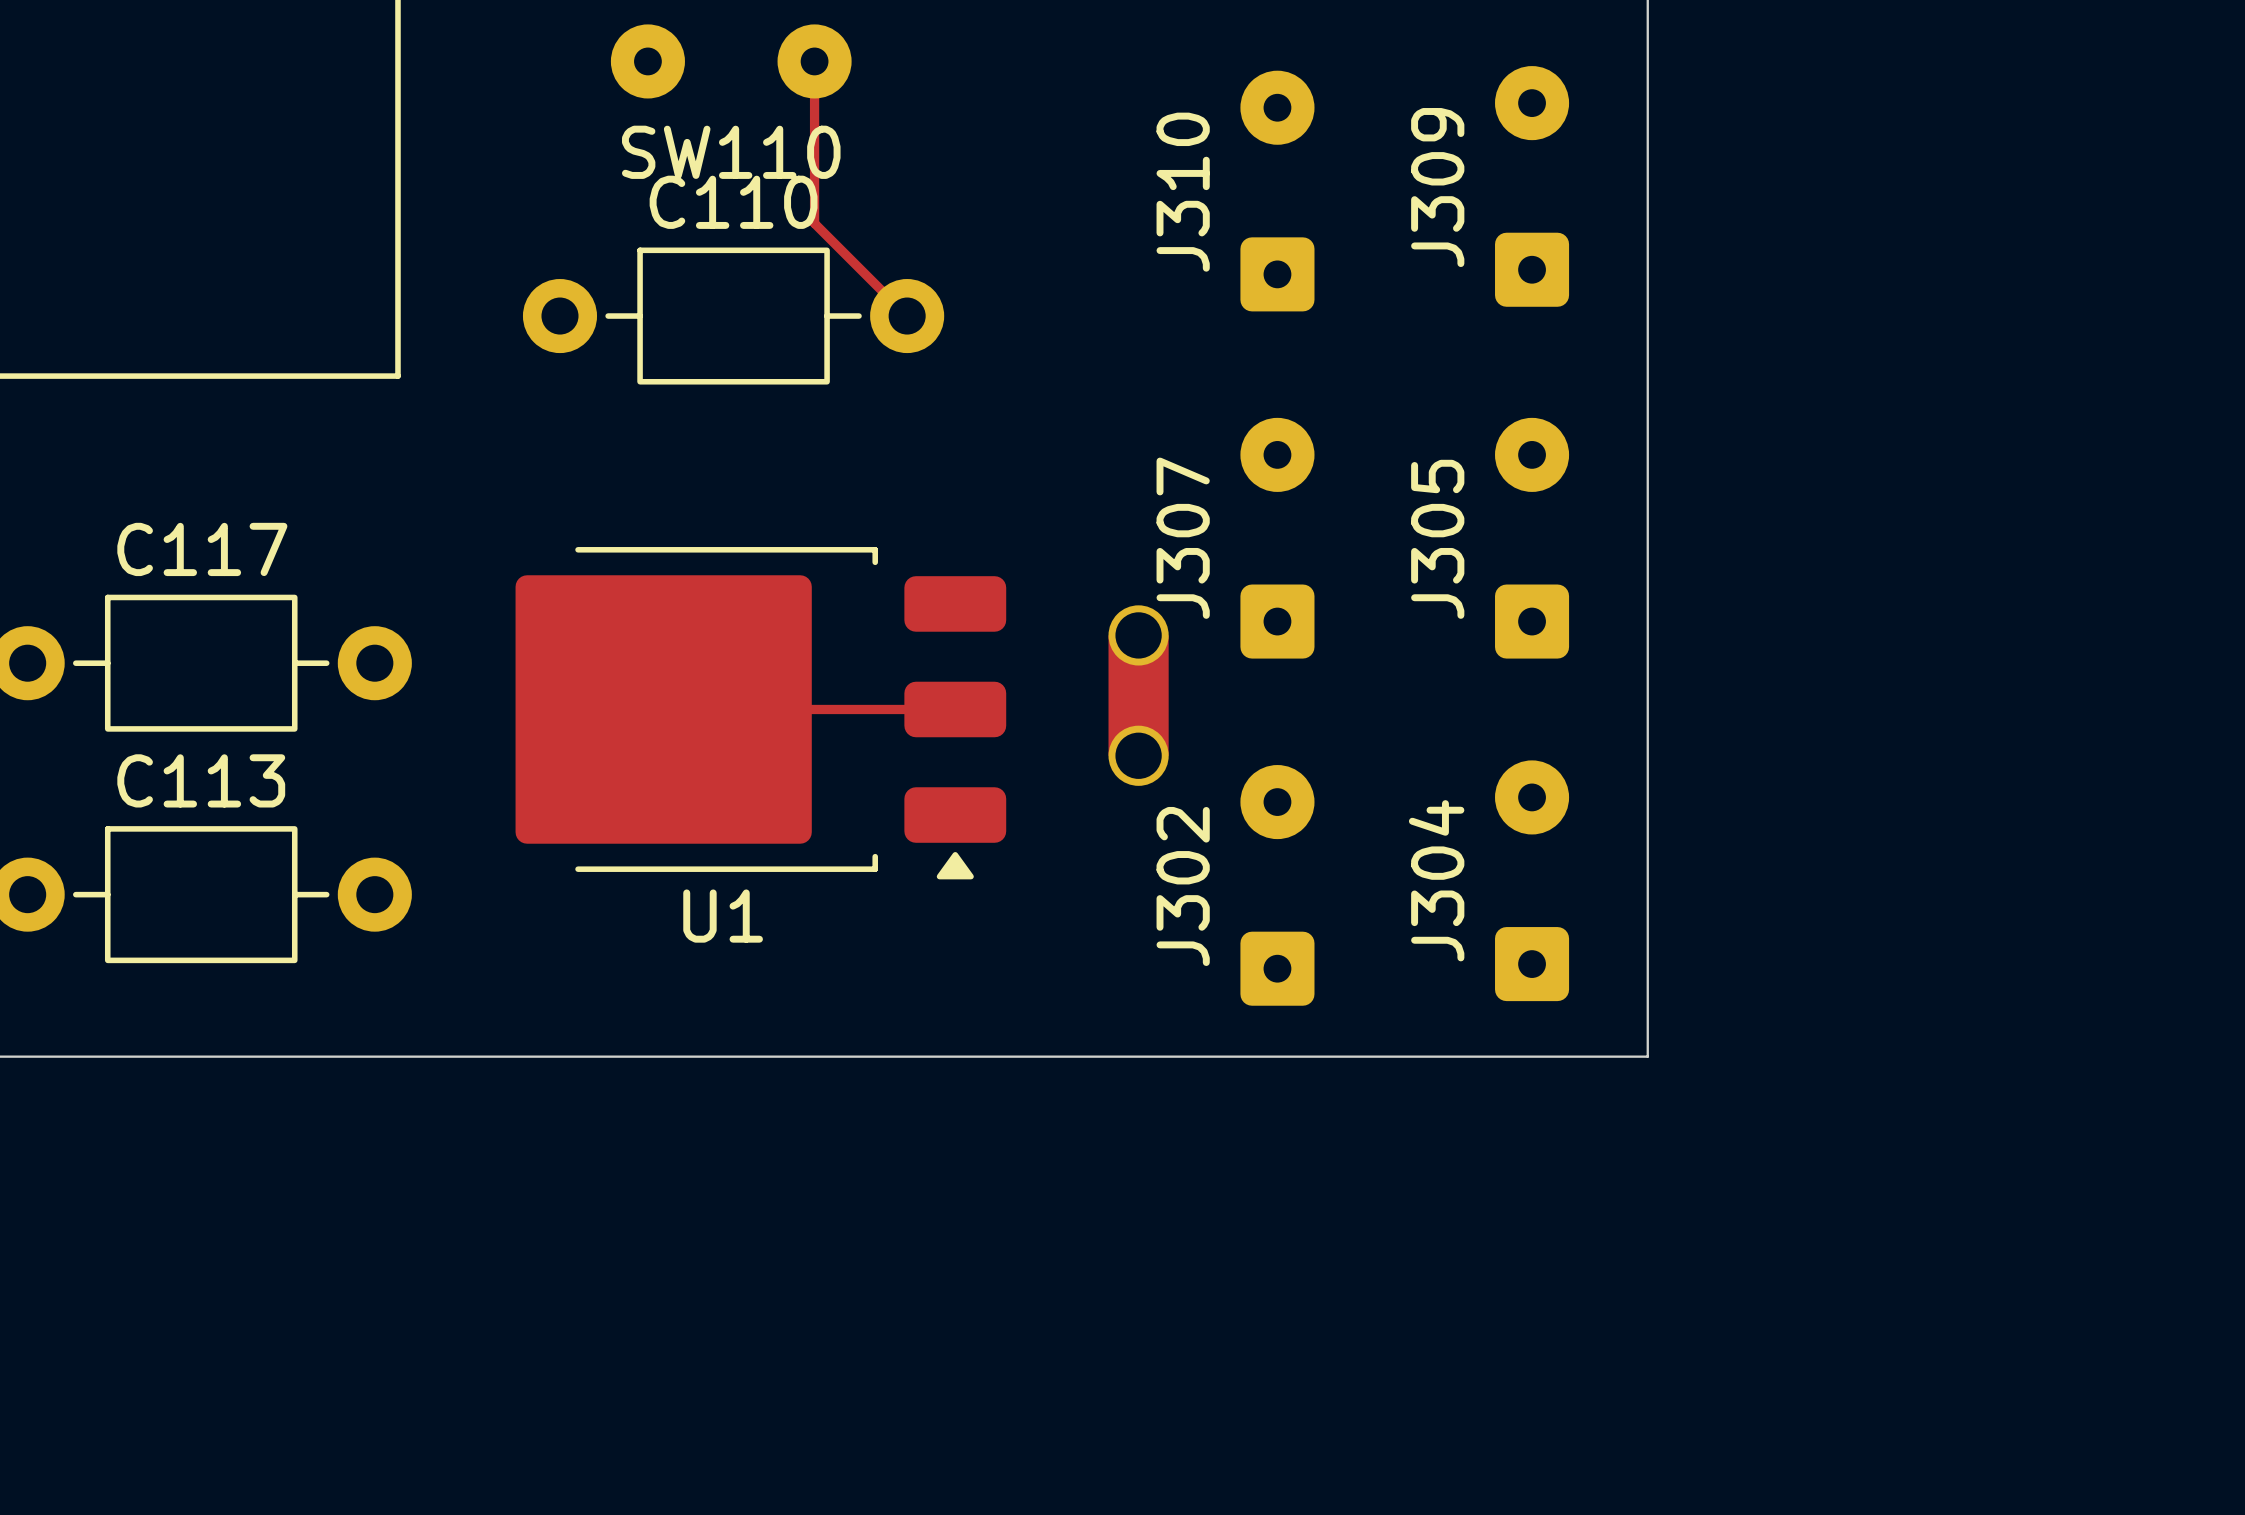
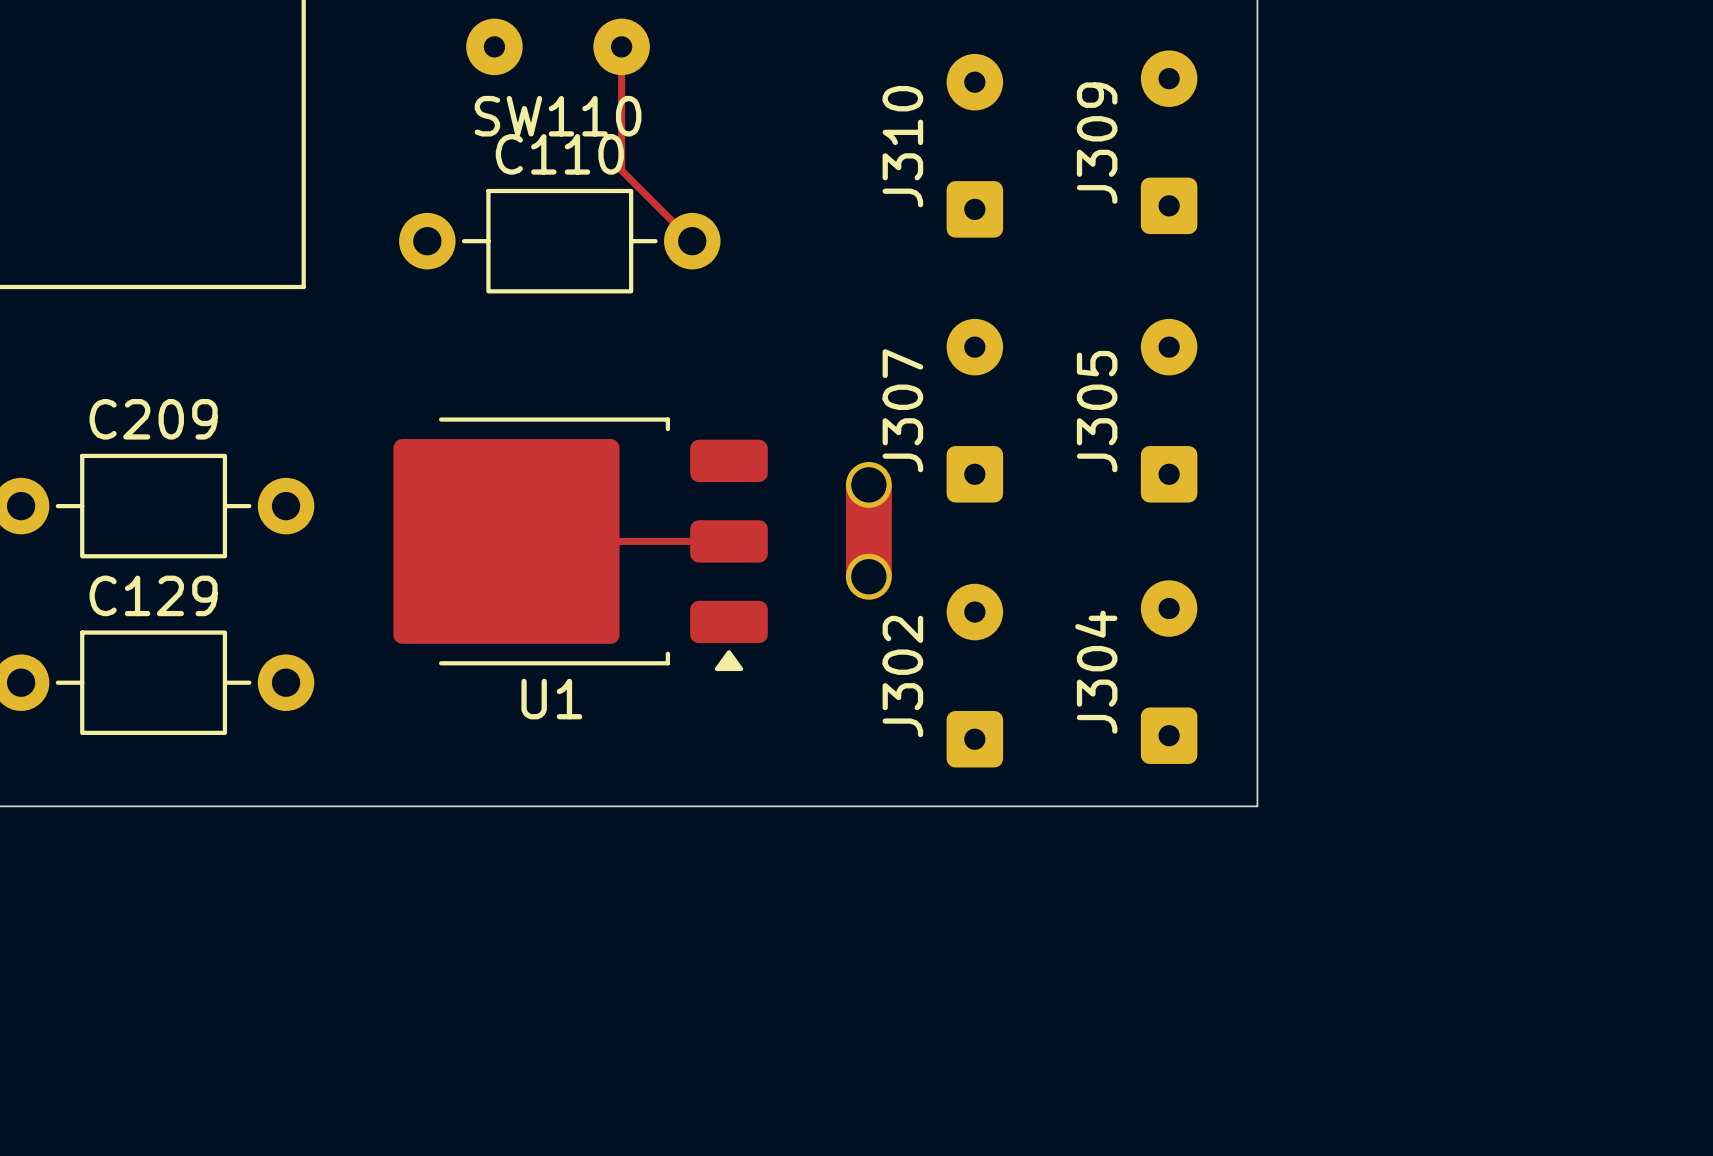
C117 name: C117 (202, 549) -> C209 (153, 419)
C113 name: C113 (201, 780) -> C129 (153, 595)

